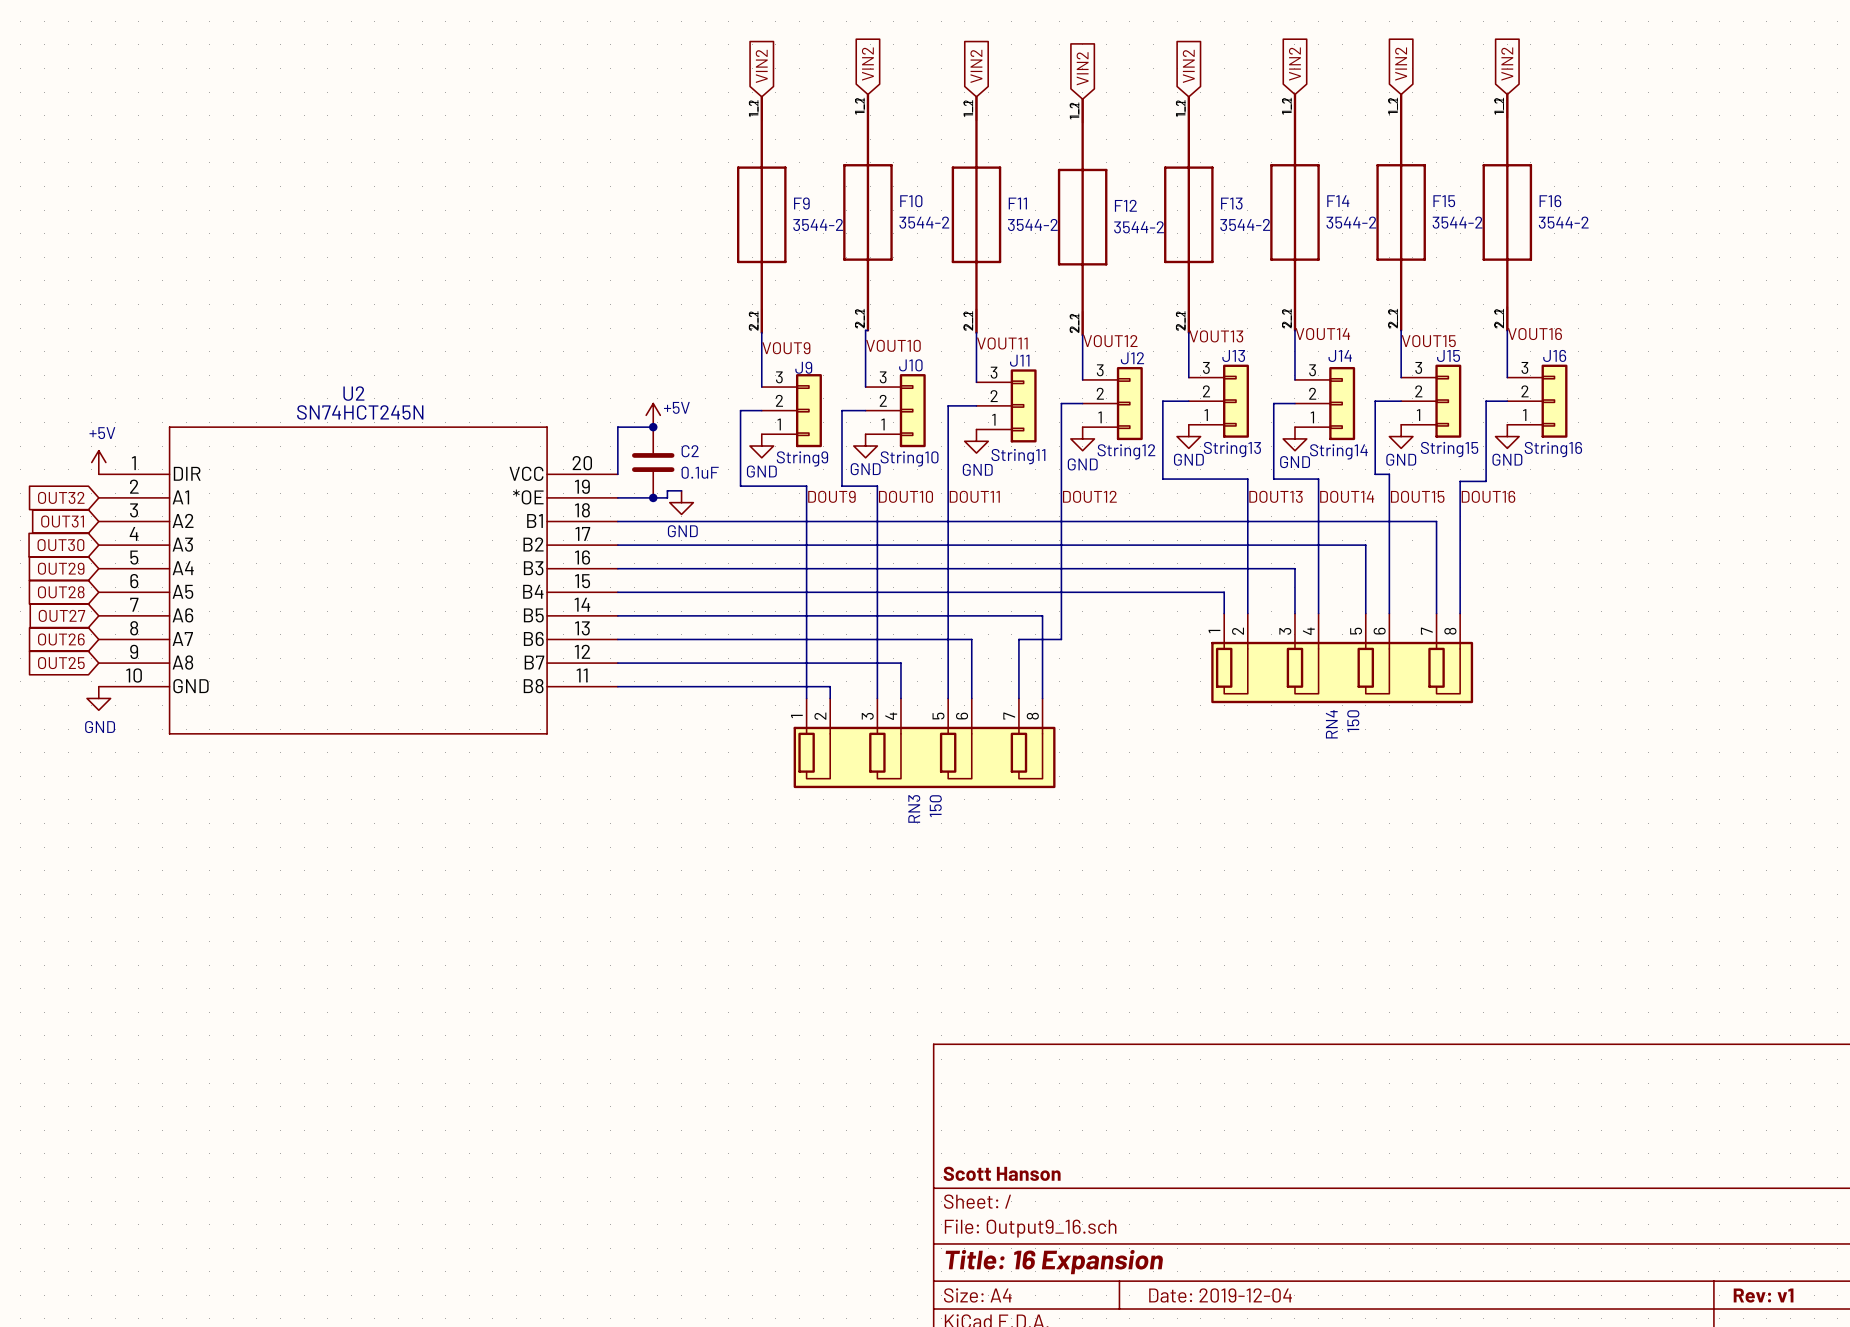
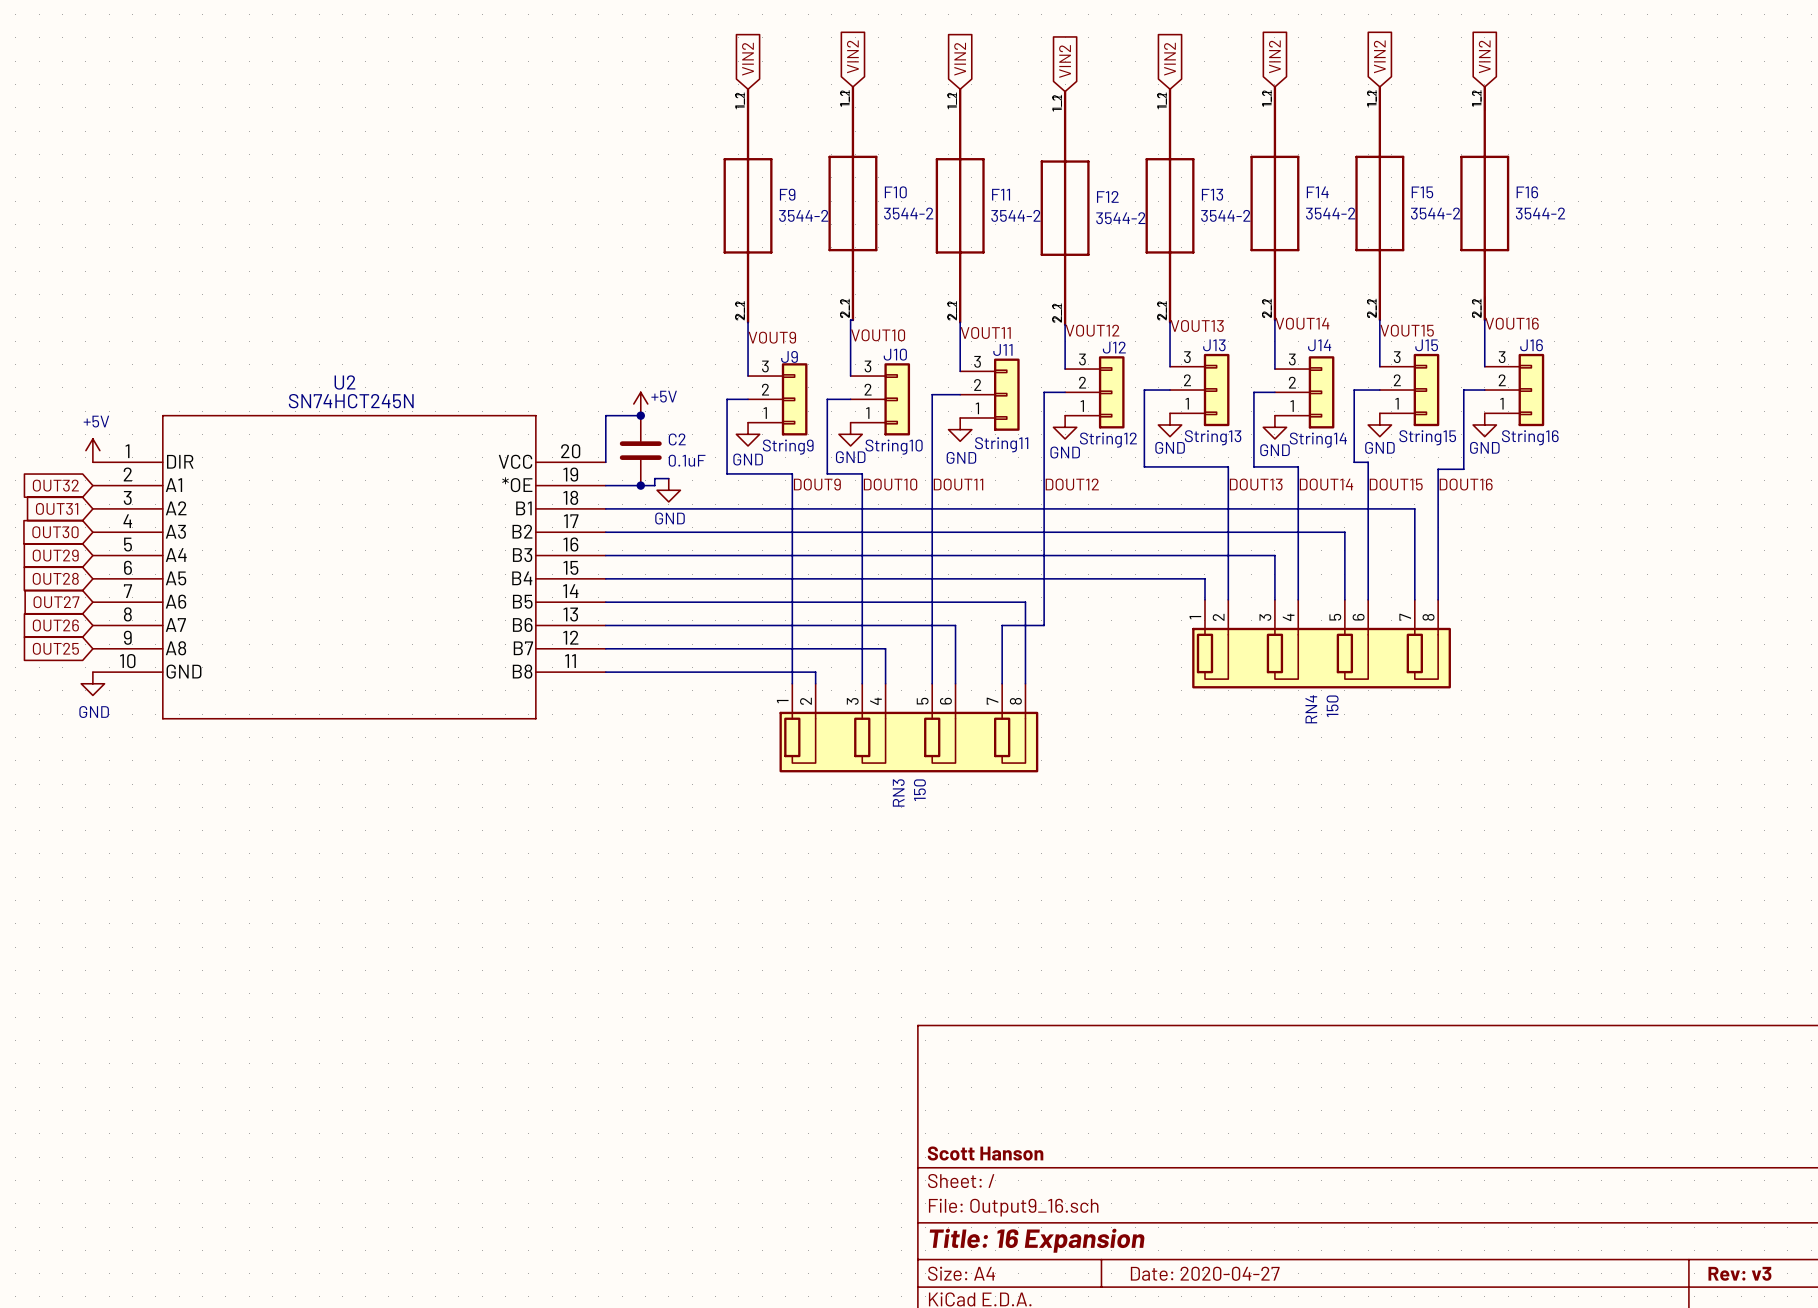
title block: Date: 2019-12-04 (1220, 1295) -> Date: 2020-04-27 (1205, 1273)
title block: Rev: v1 (1763, 1295) -> Rev: v3 (1739, 1273)

